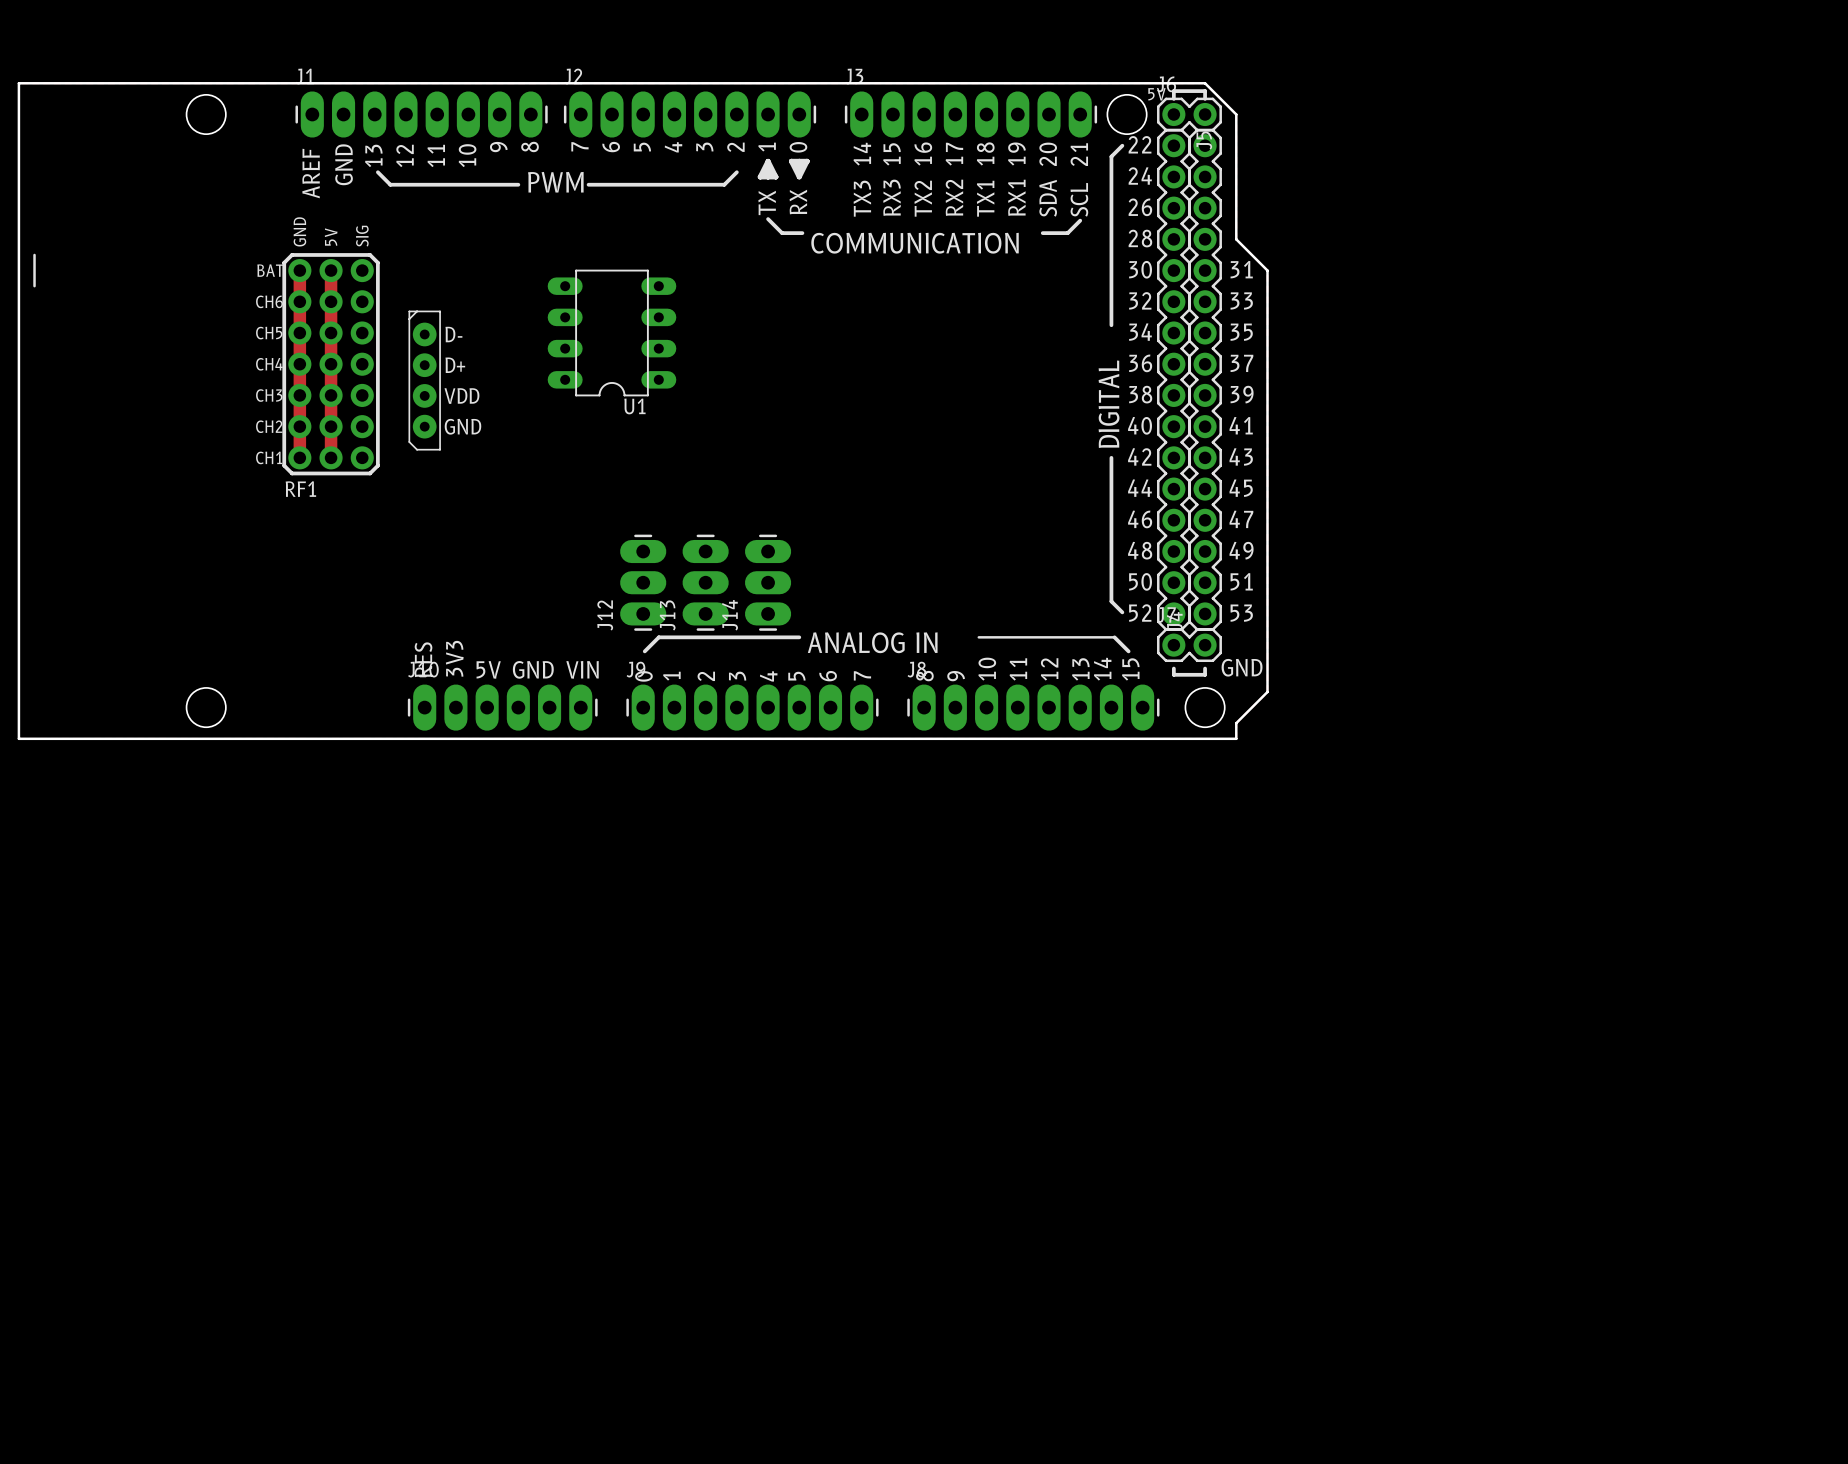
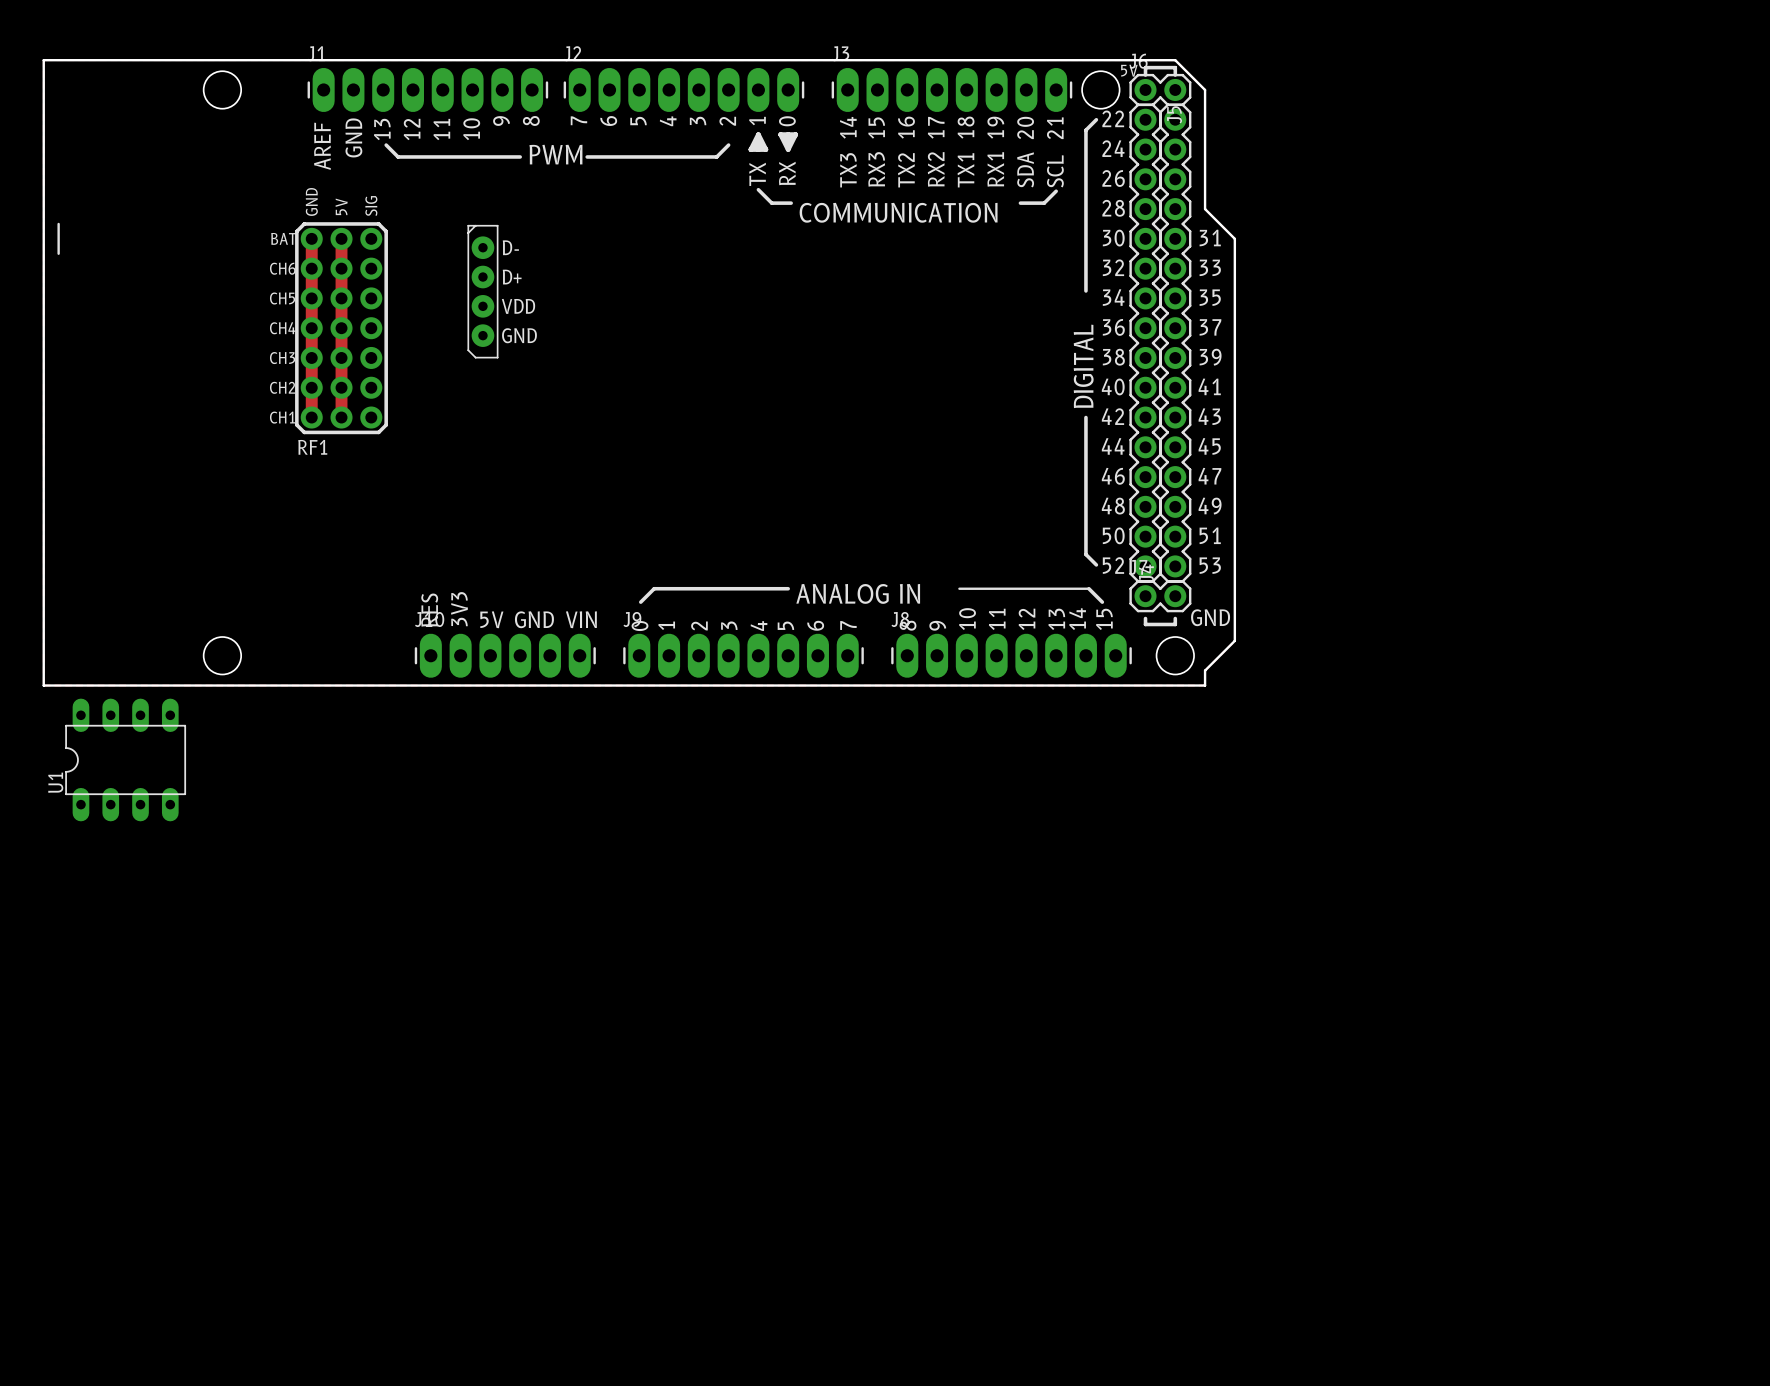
U1 rotation: 0° (611, 333) -> 90° clockwise (125, 759)
U1 position: (611, 333) -> (125, 759)
part position: (424, 380) -> (482, 291)
J12: (643, 582) -> none
J13: (705, 582) -> none
J14: (768, 582) -> none

